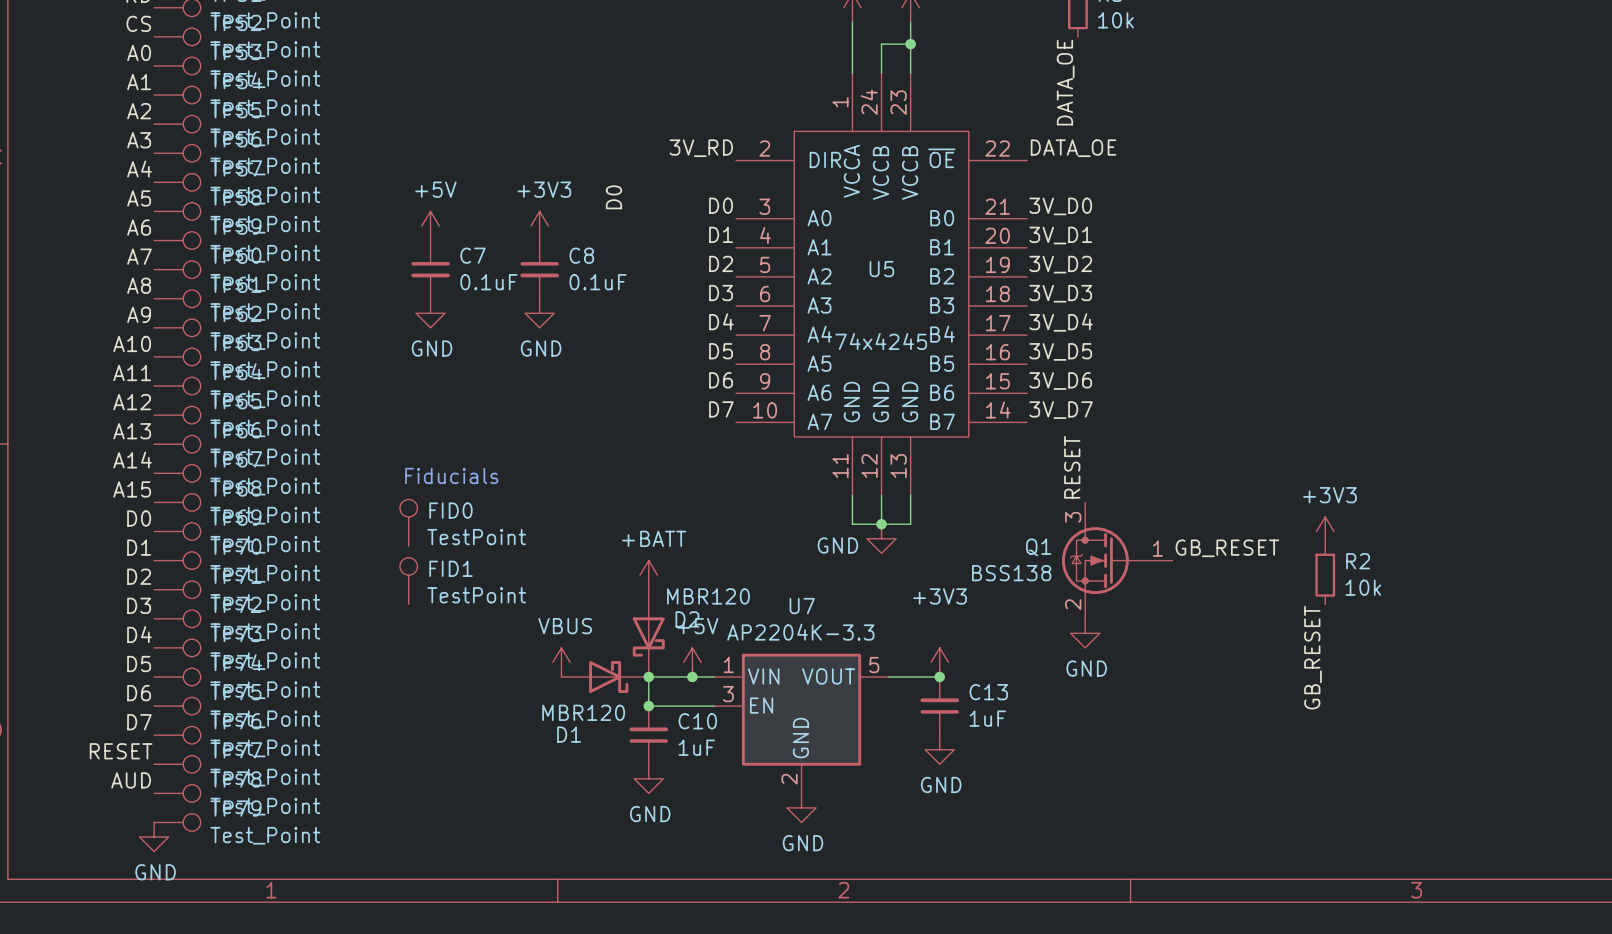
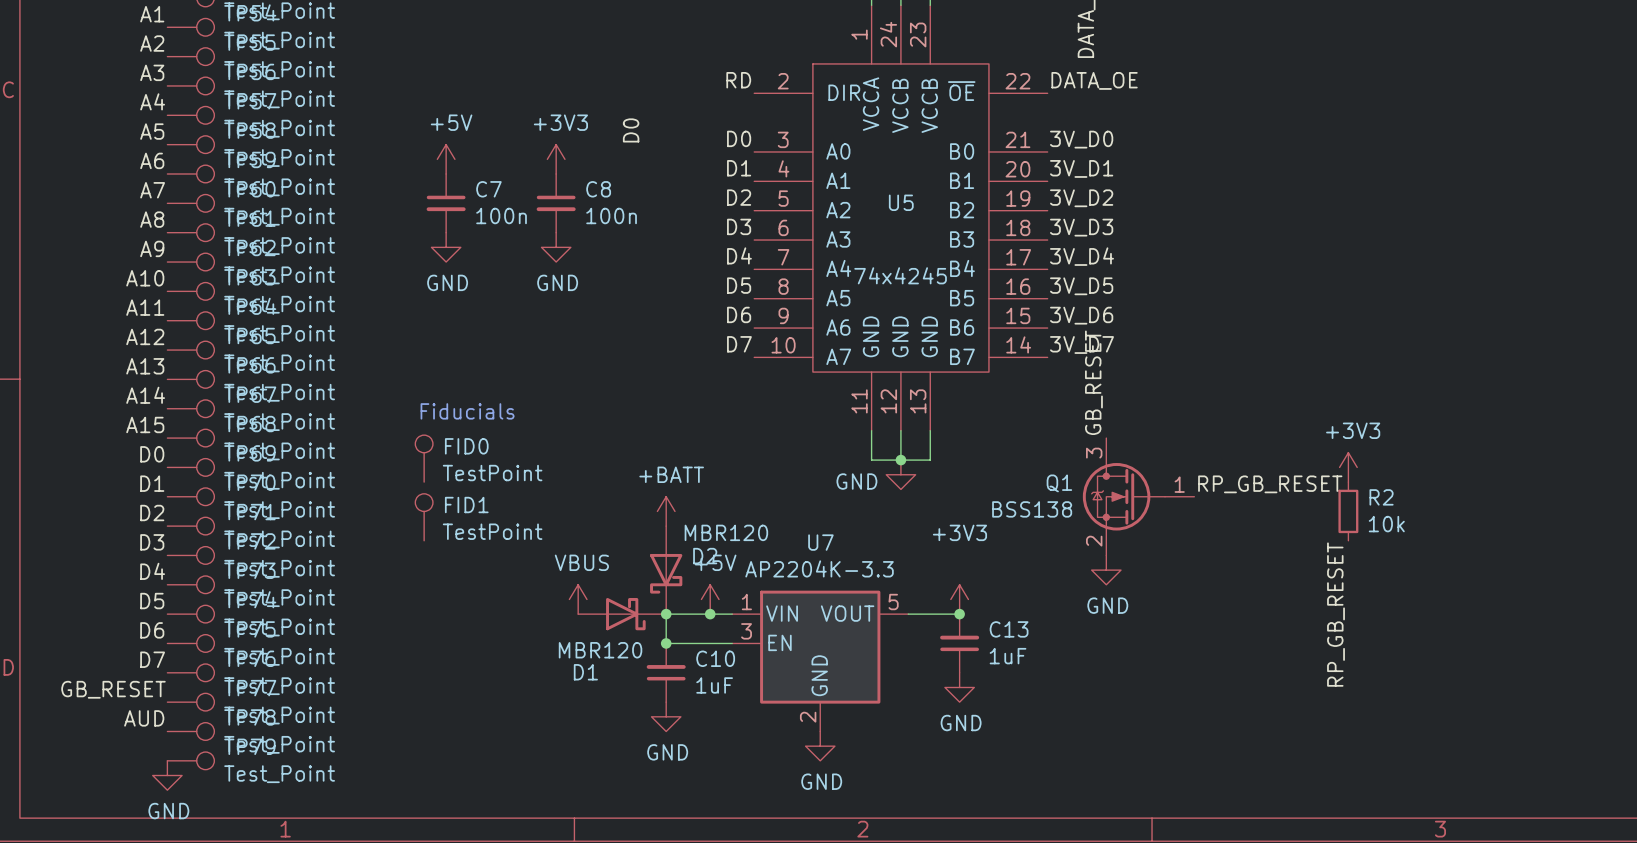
label: 3V_RD (701, 148) -> RD (738, 80)
C7 value: 0.1uF (488, 282) -> 100n (501, 215)
C8 value: 0.1uF (598, 282) -> 100n (611, 215)
label: RESET (1072, 467) -> GB_RESET (1093, 382)
label: GB_RESET (1227, 548) -> RP_GB_RESET (1270, 484)
label: GB_RESET (1312, 657) -> RP_GB_RESET (1336, 614)
label: RESET (121, 751) -> GB_RESET (113, 689)

